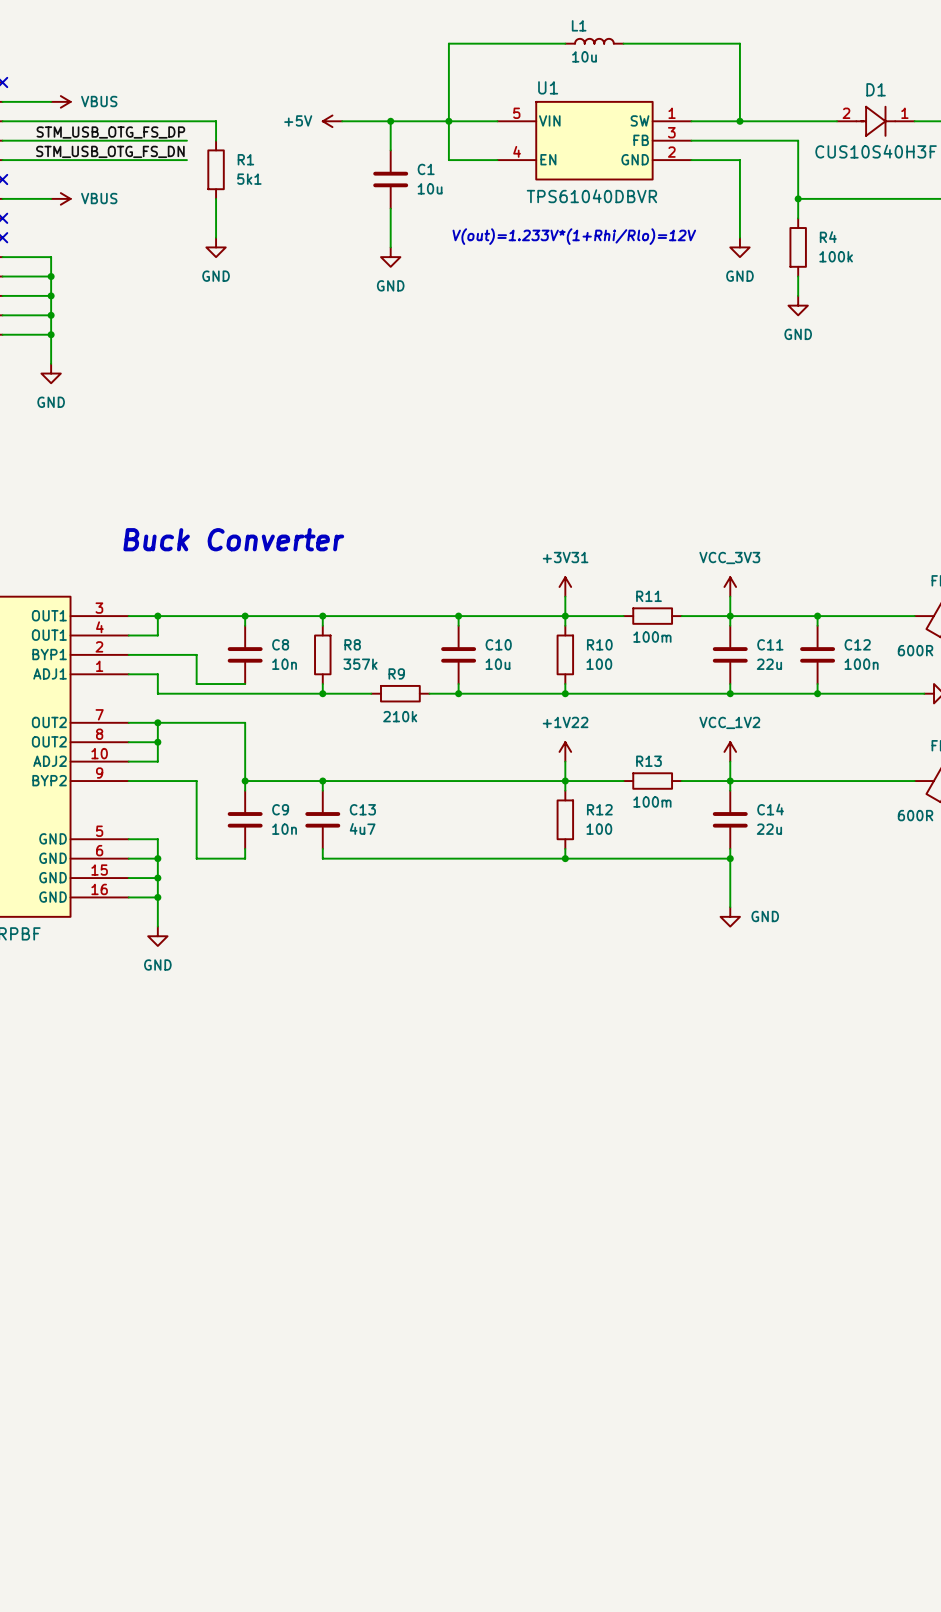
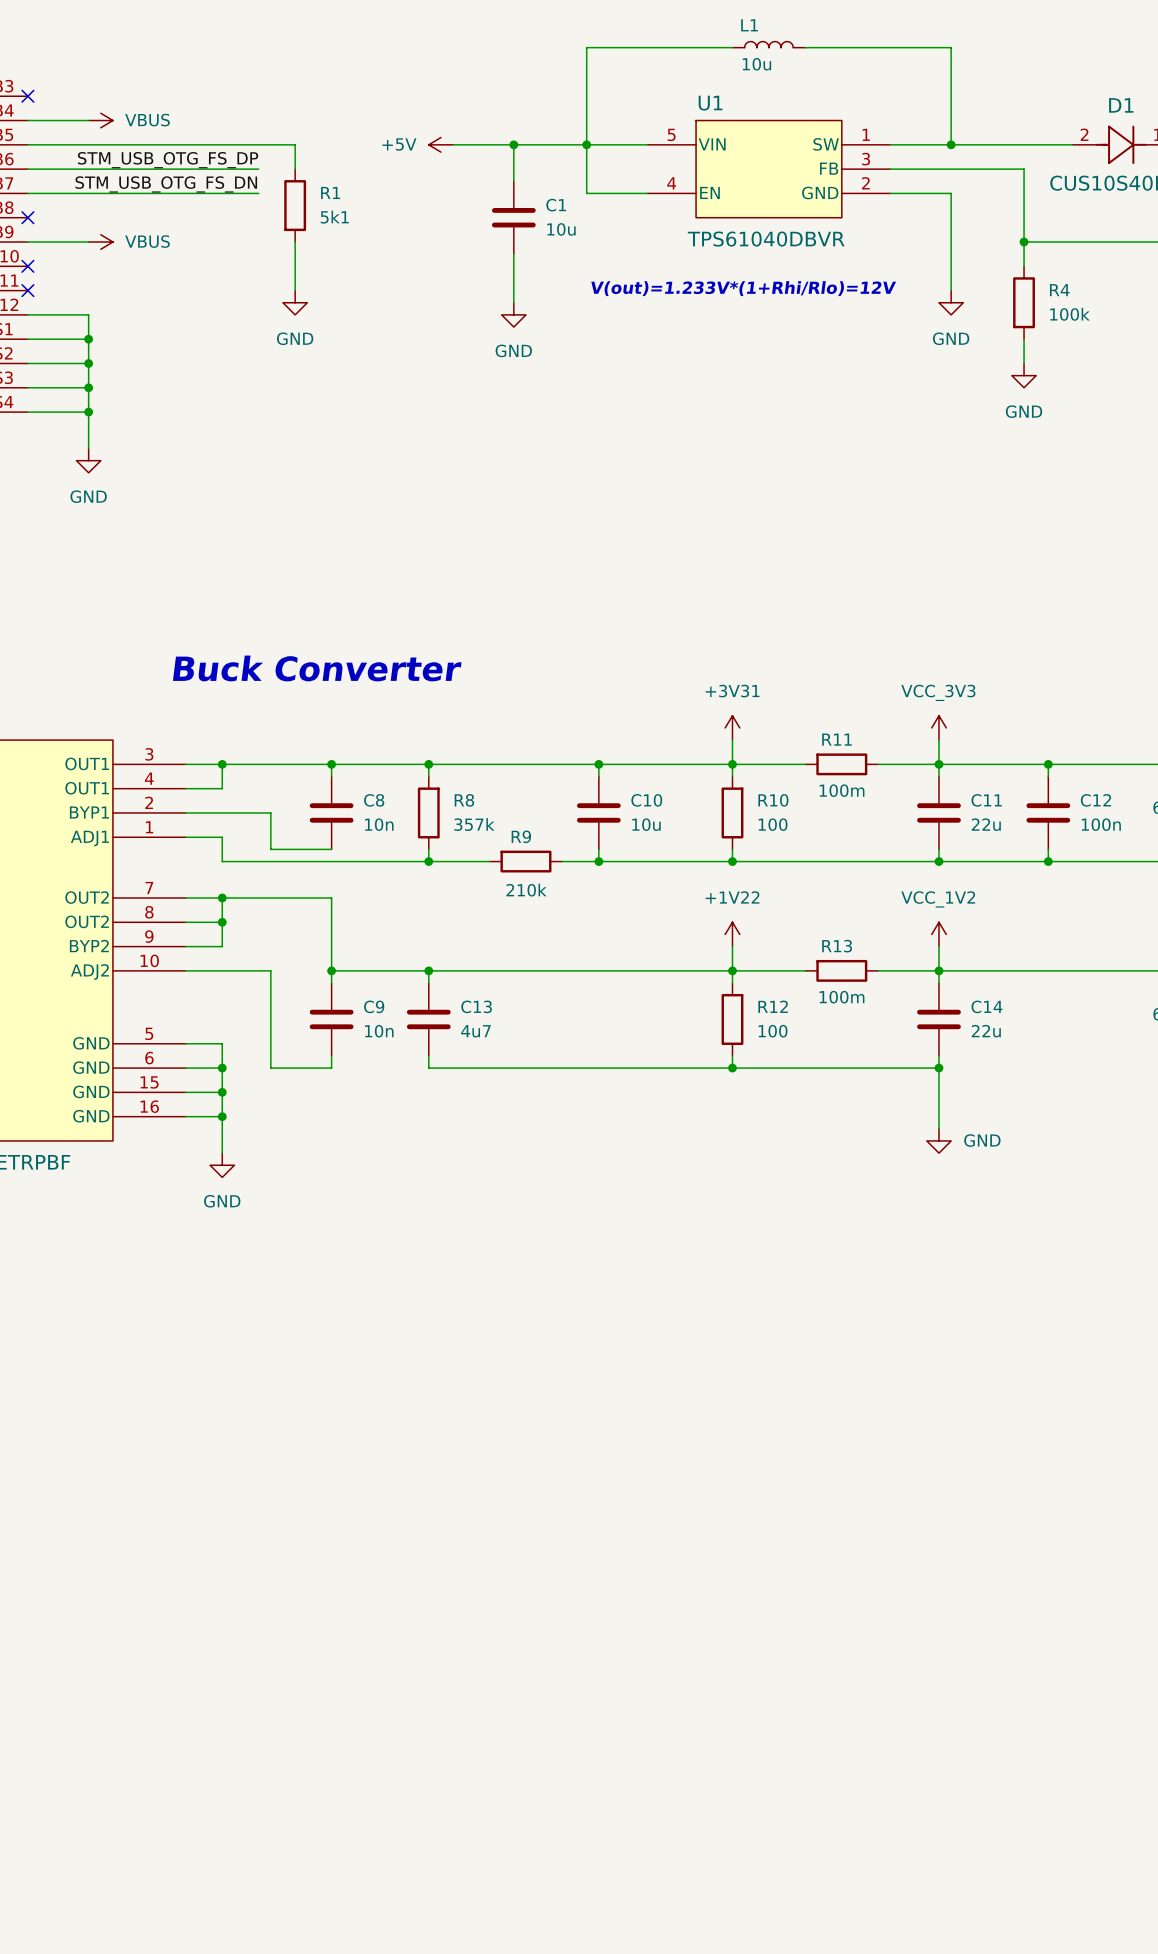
part pin number: 10 (99, 753) -> 9 (149, 936)
part pin name: ADJ2 (50, 761) -> BYP2 (89, 946)
part pin number: 9 (99, 773) -> 10 (149, 960)
part pin name: BYP2 (49, 780) -> ADJ2 (89, 971)

